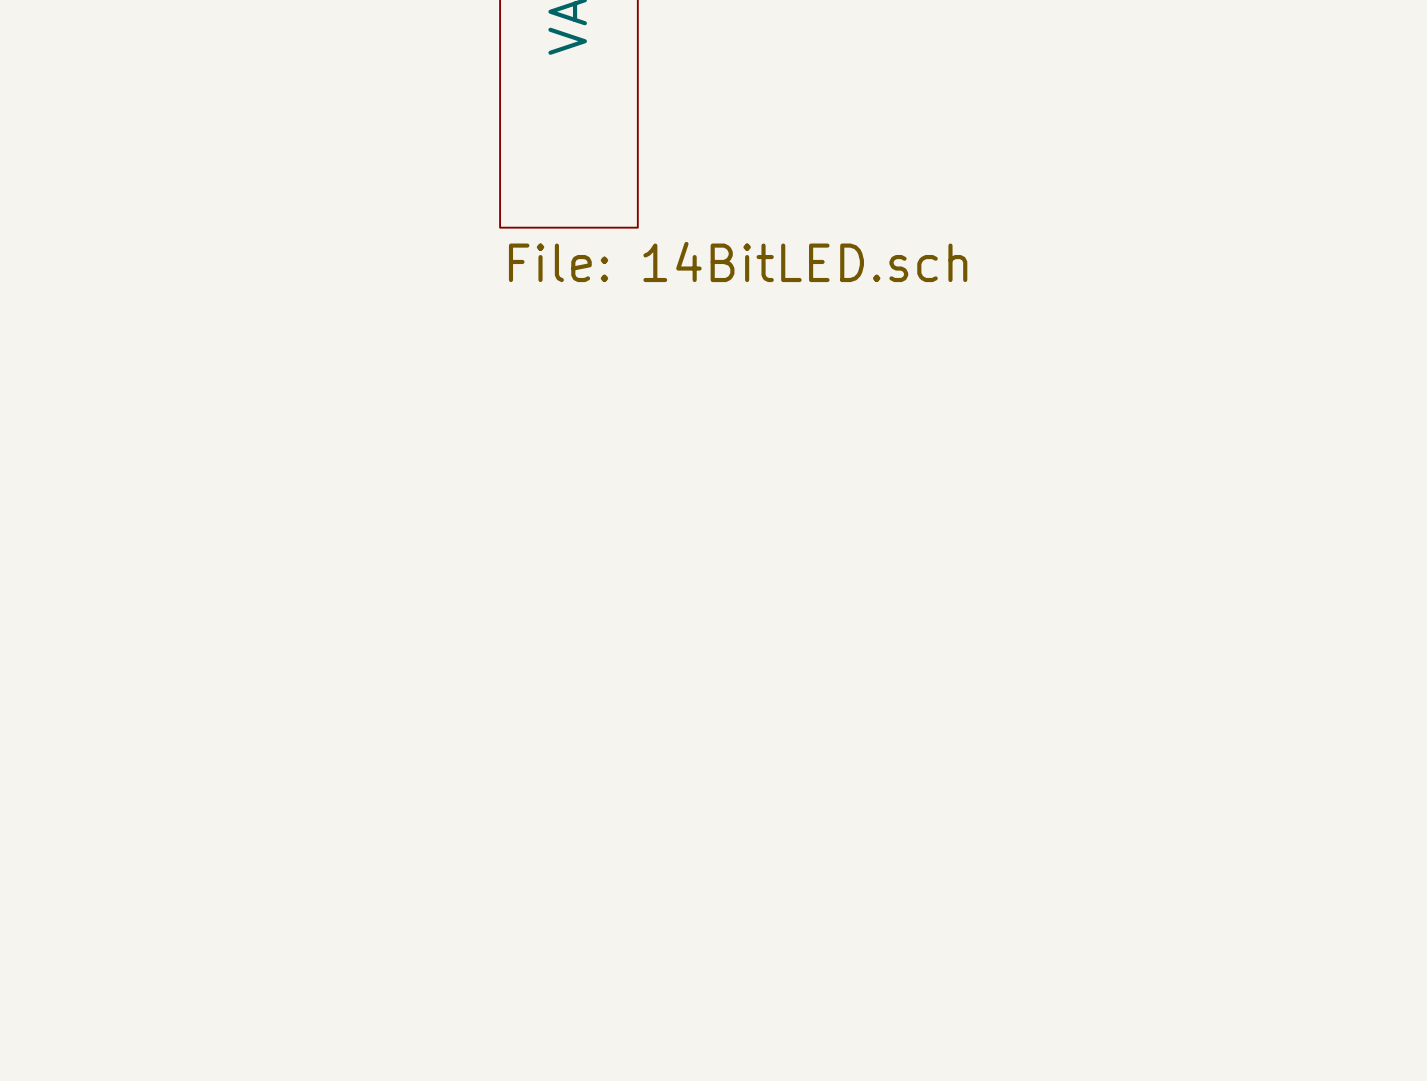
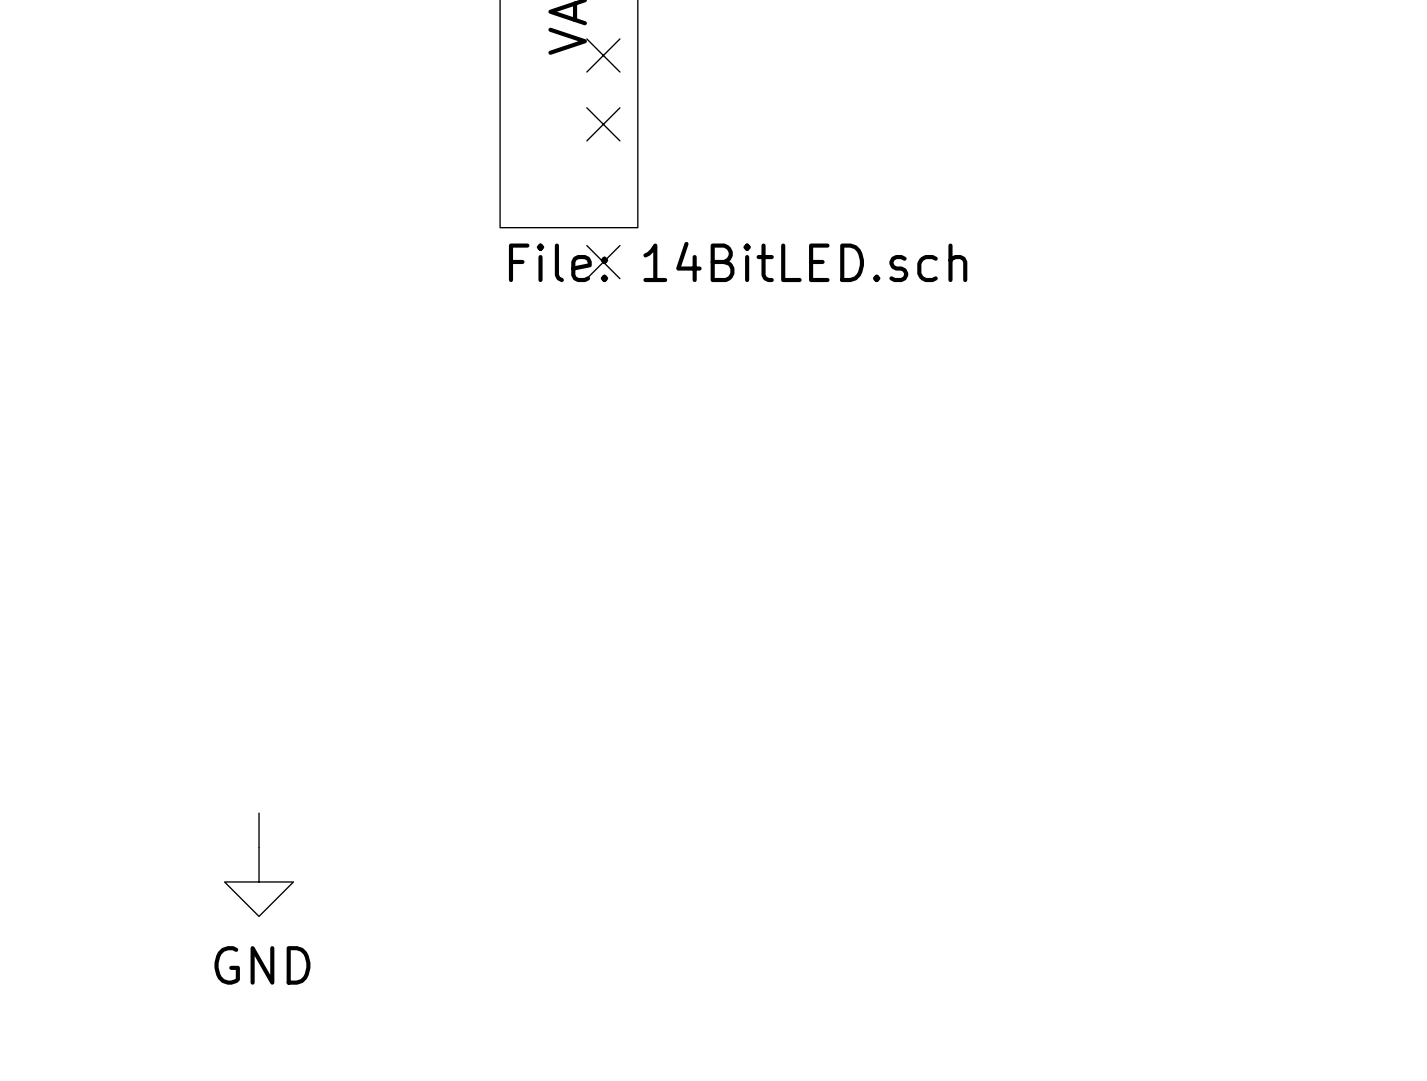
no-connect mark: none -> (603, 55)
no-connect mark: none -> (603, 124)
no-connect mark: none -> (603, 262)
wire: none -> (259, 813) (259, 847)
power symbol: none -> GND (259, 881)

